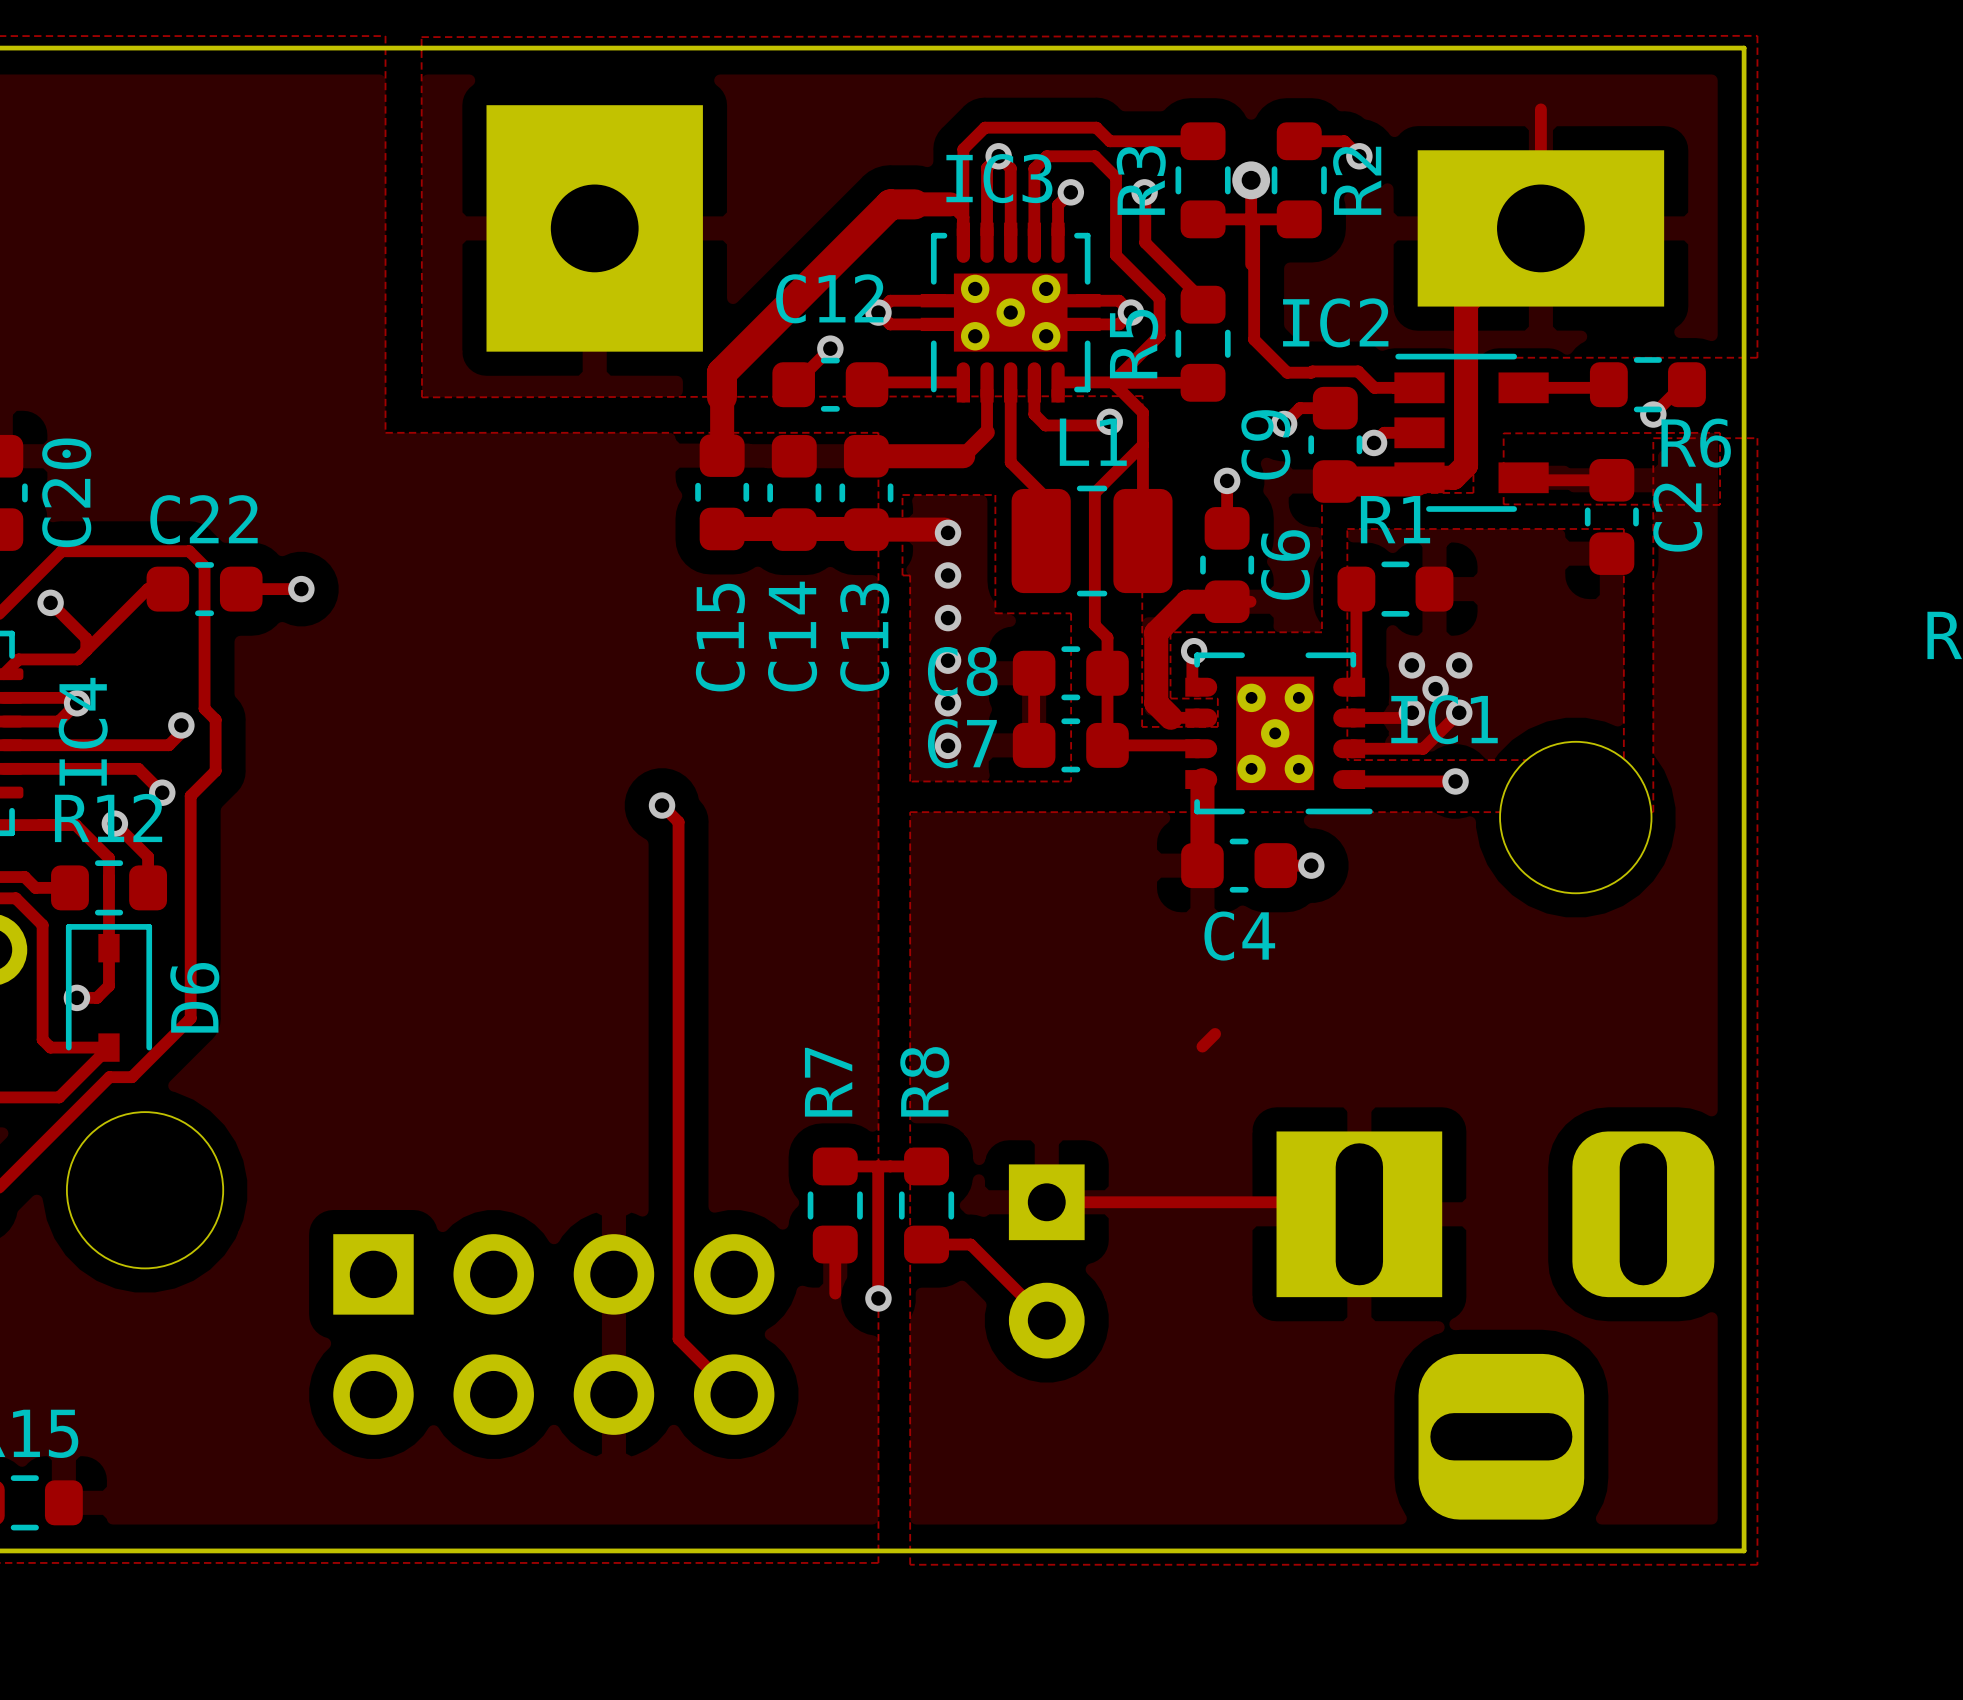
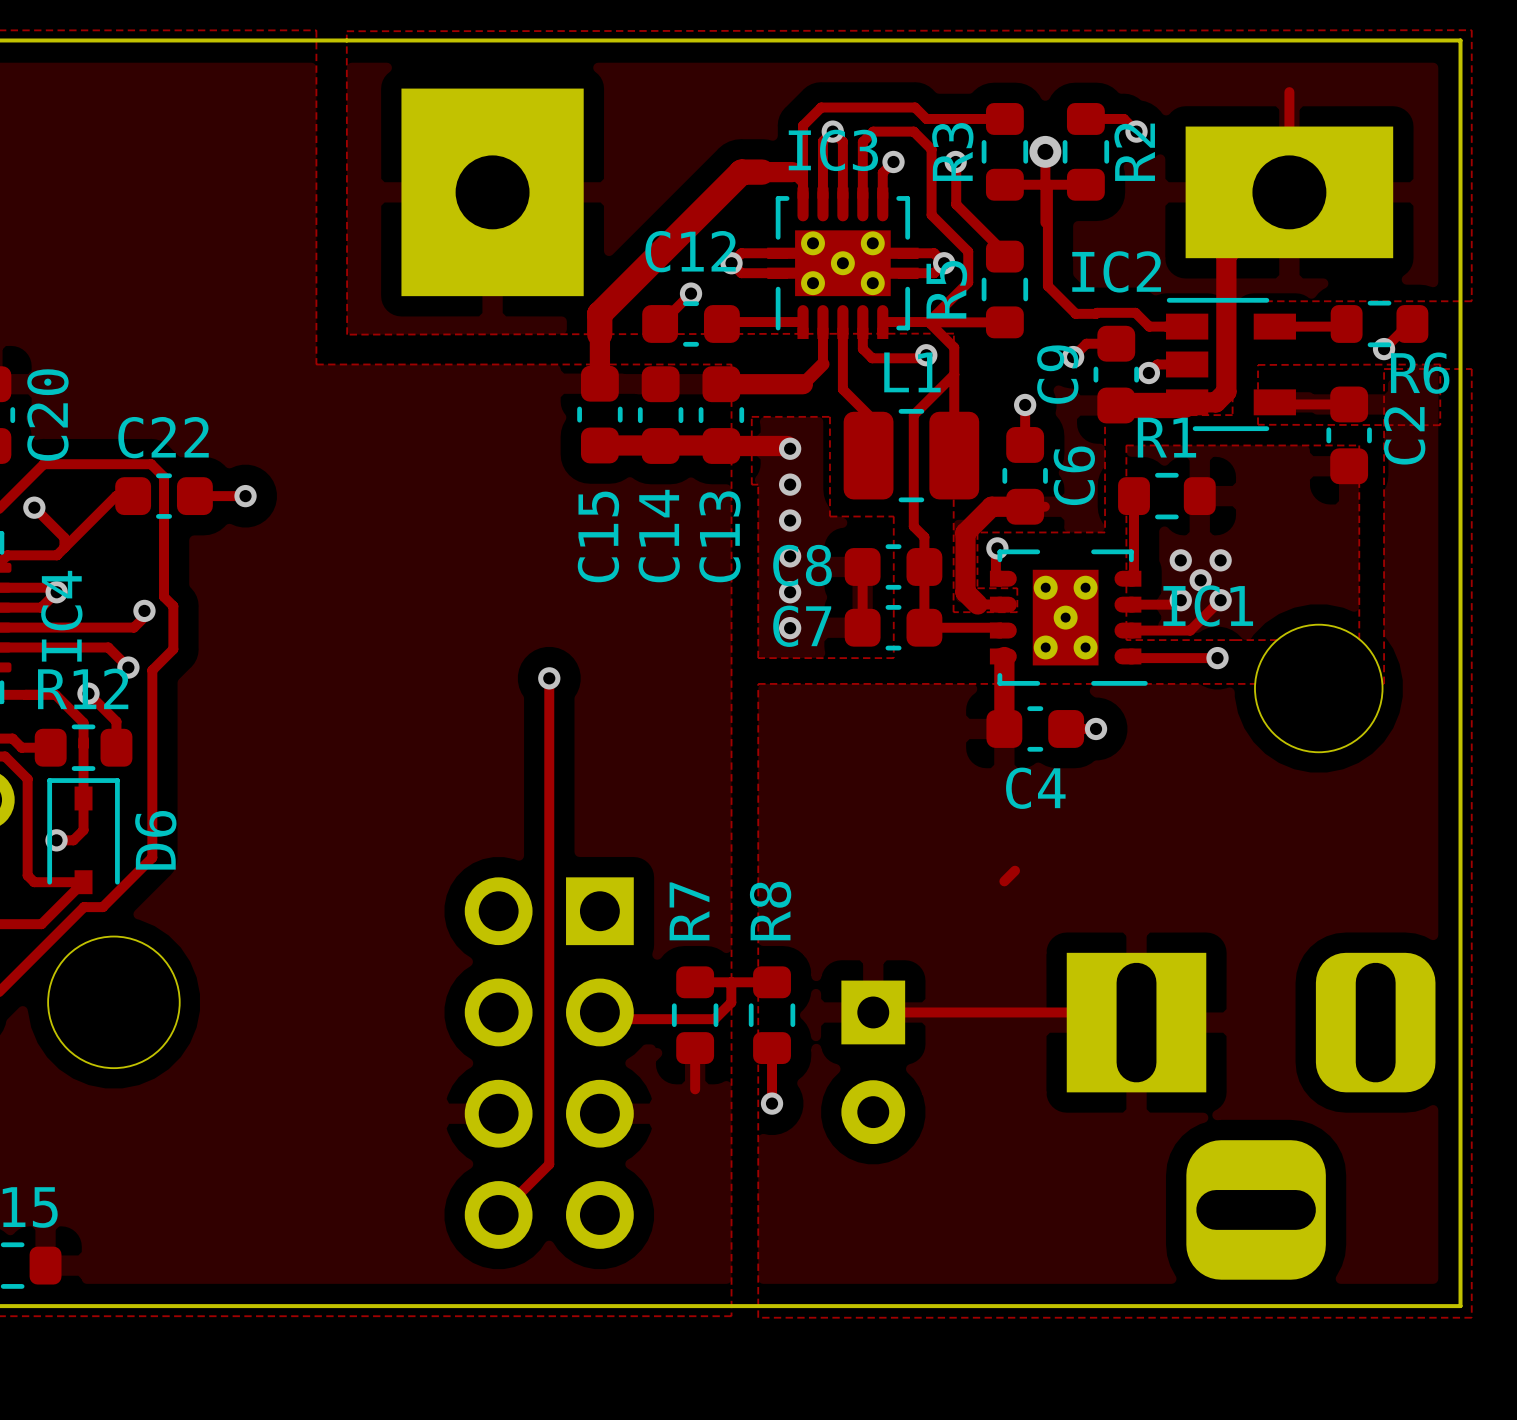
track: (662, 805) (678, 822) (678, 1339) (734, 1394) -> (549, 678) (549, 1164) (498, 1214)
track: (878, 1190) (878, 1298) -> (731, 1002) (714, 1019) (606, 1019) (599, 1012)
track: (926, 1244) (970, 1244) (1046, 1320) -> (772, 1048) (772, 1103)
via position: (878, 1298) -> (772, 1103)
part rotation: 0° (553, 1334) -> 90° clockwise (549, 1063)

